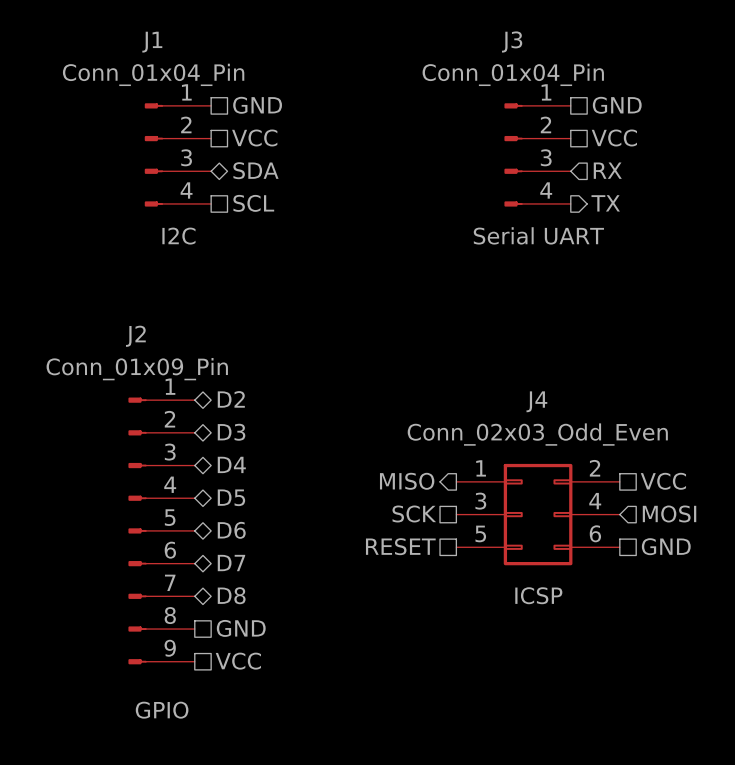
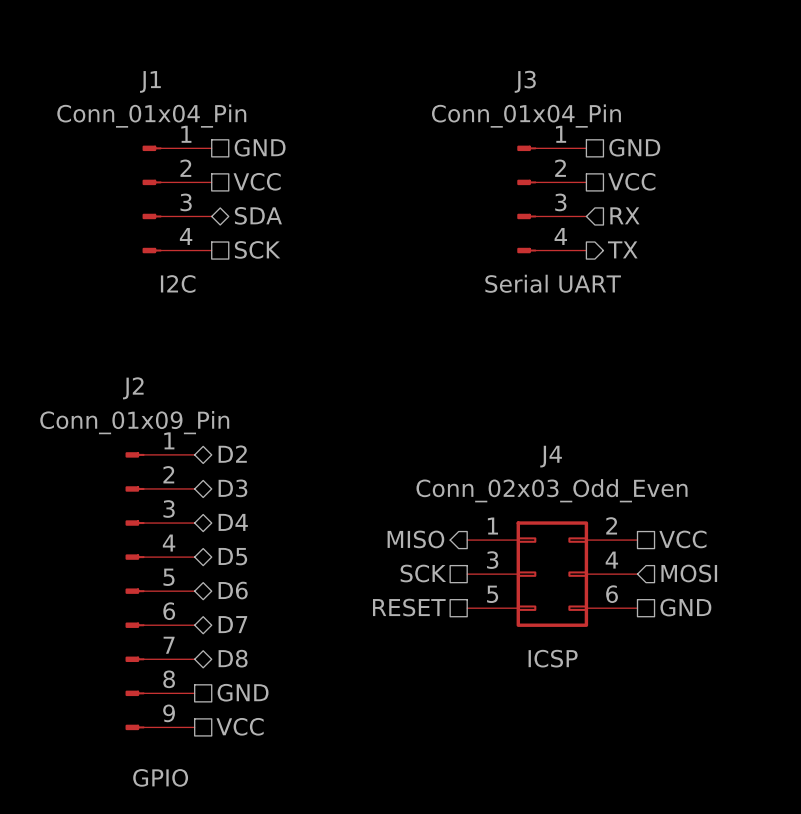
hierarchical label: SCL (253, 203) -> SCK (257, 249)

